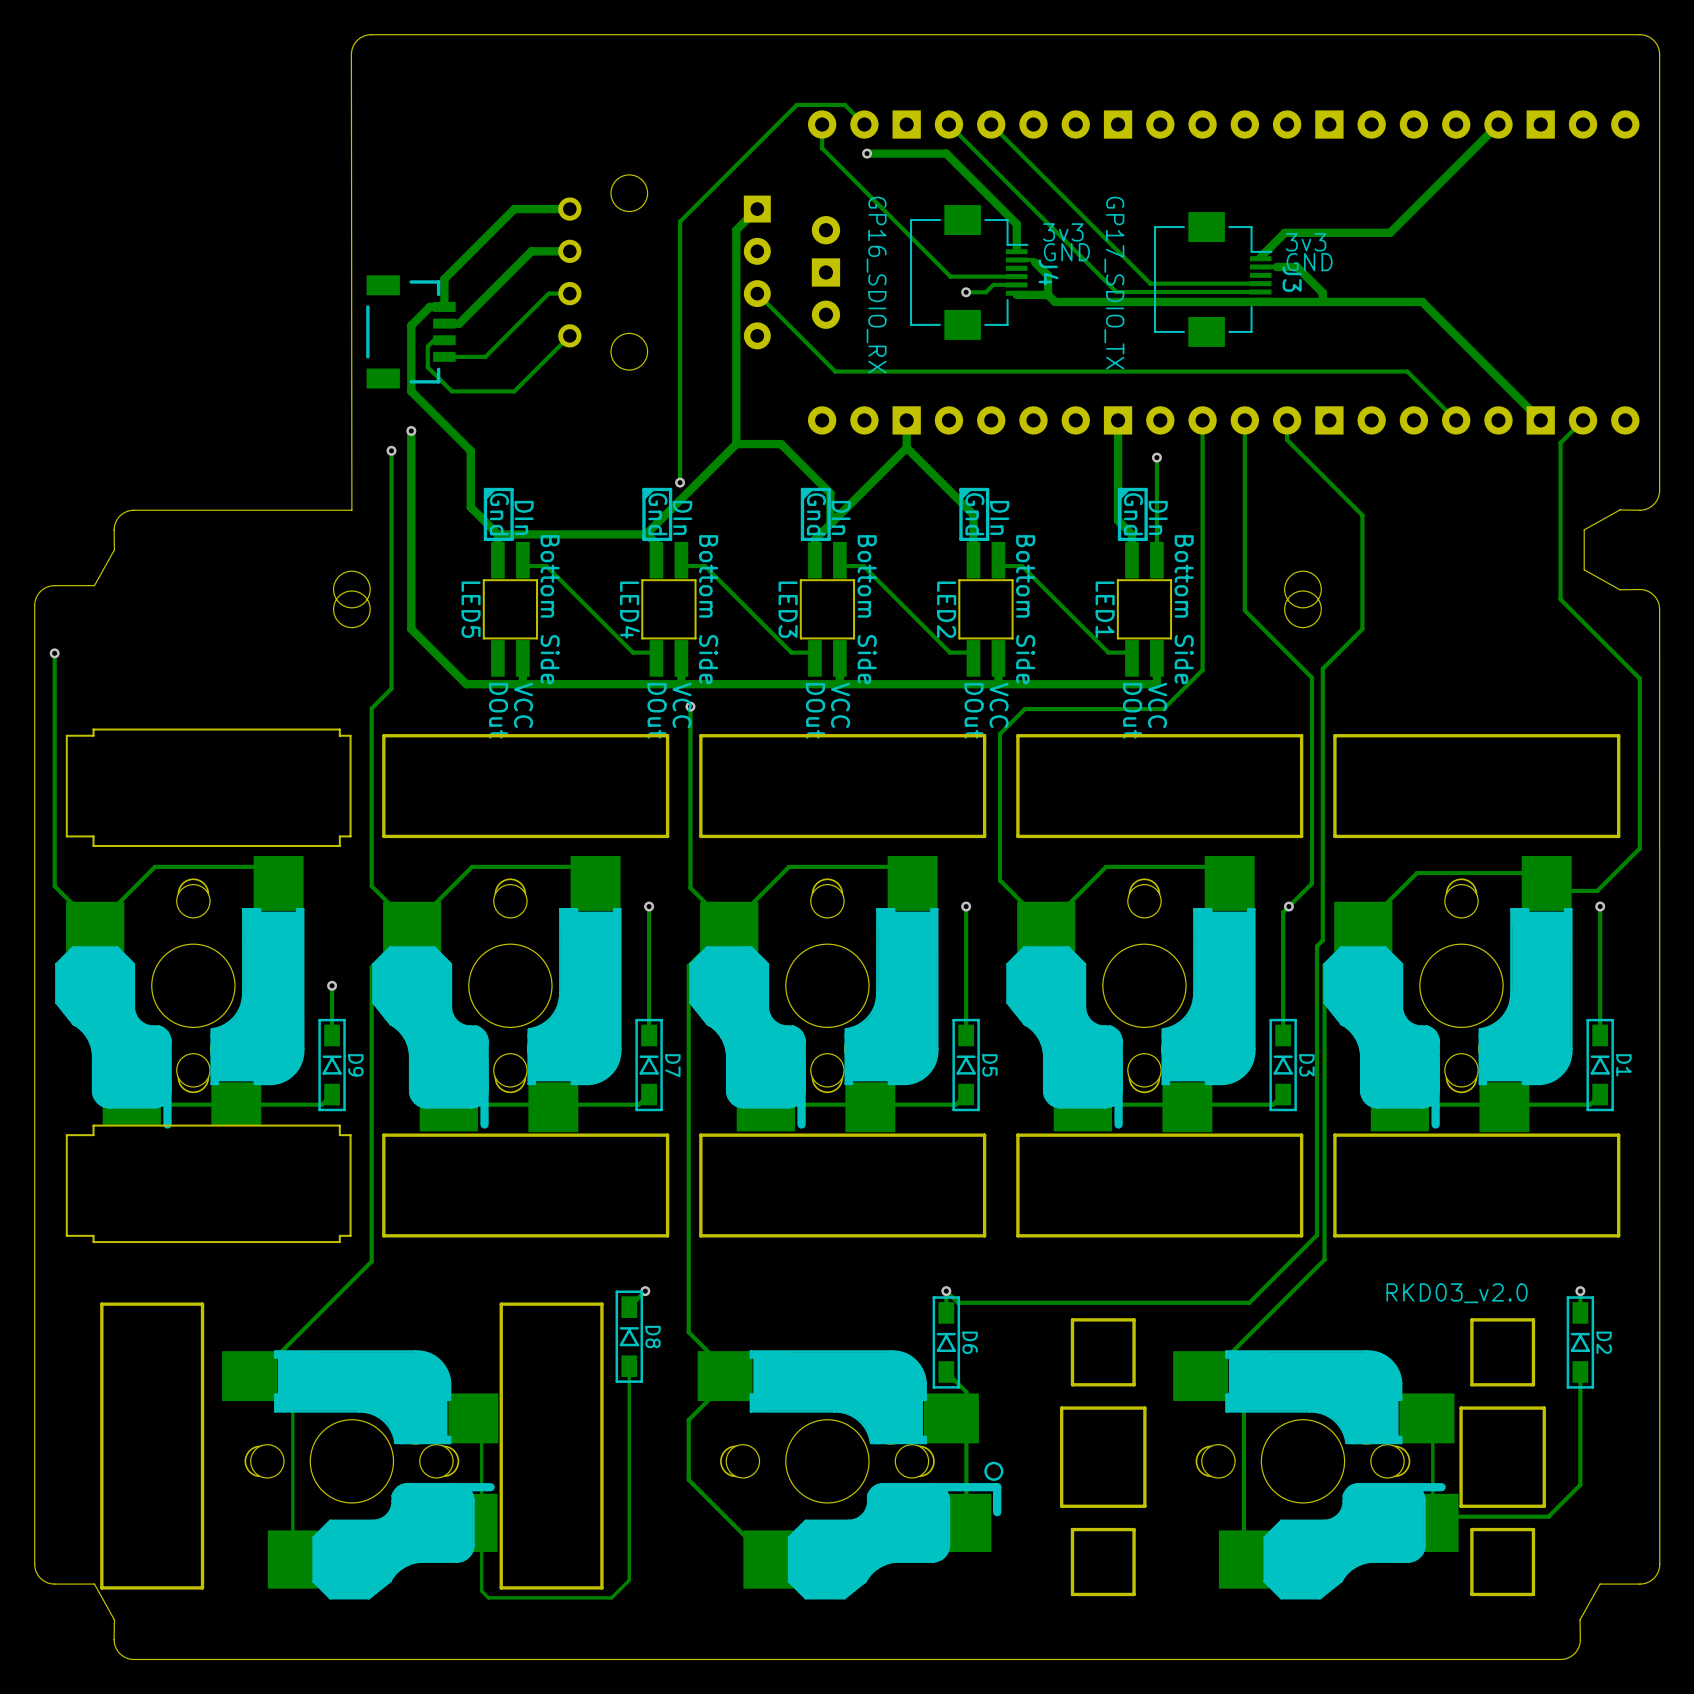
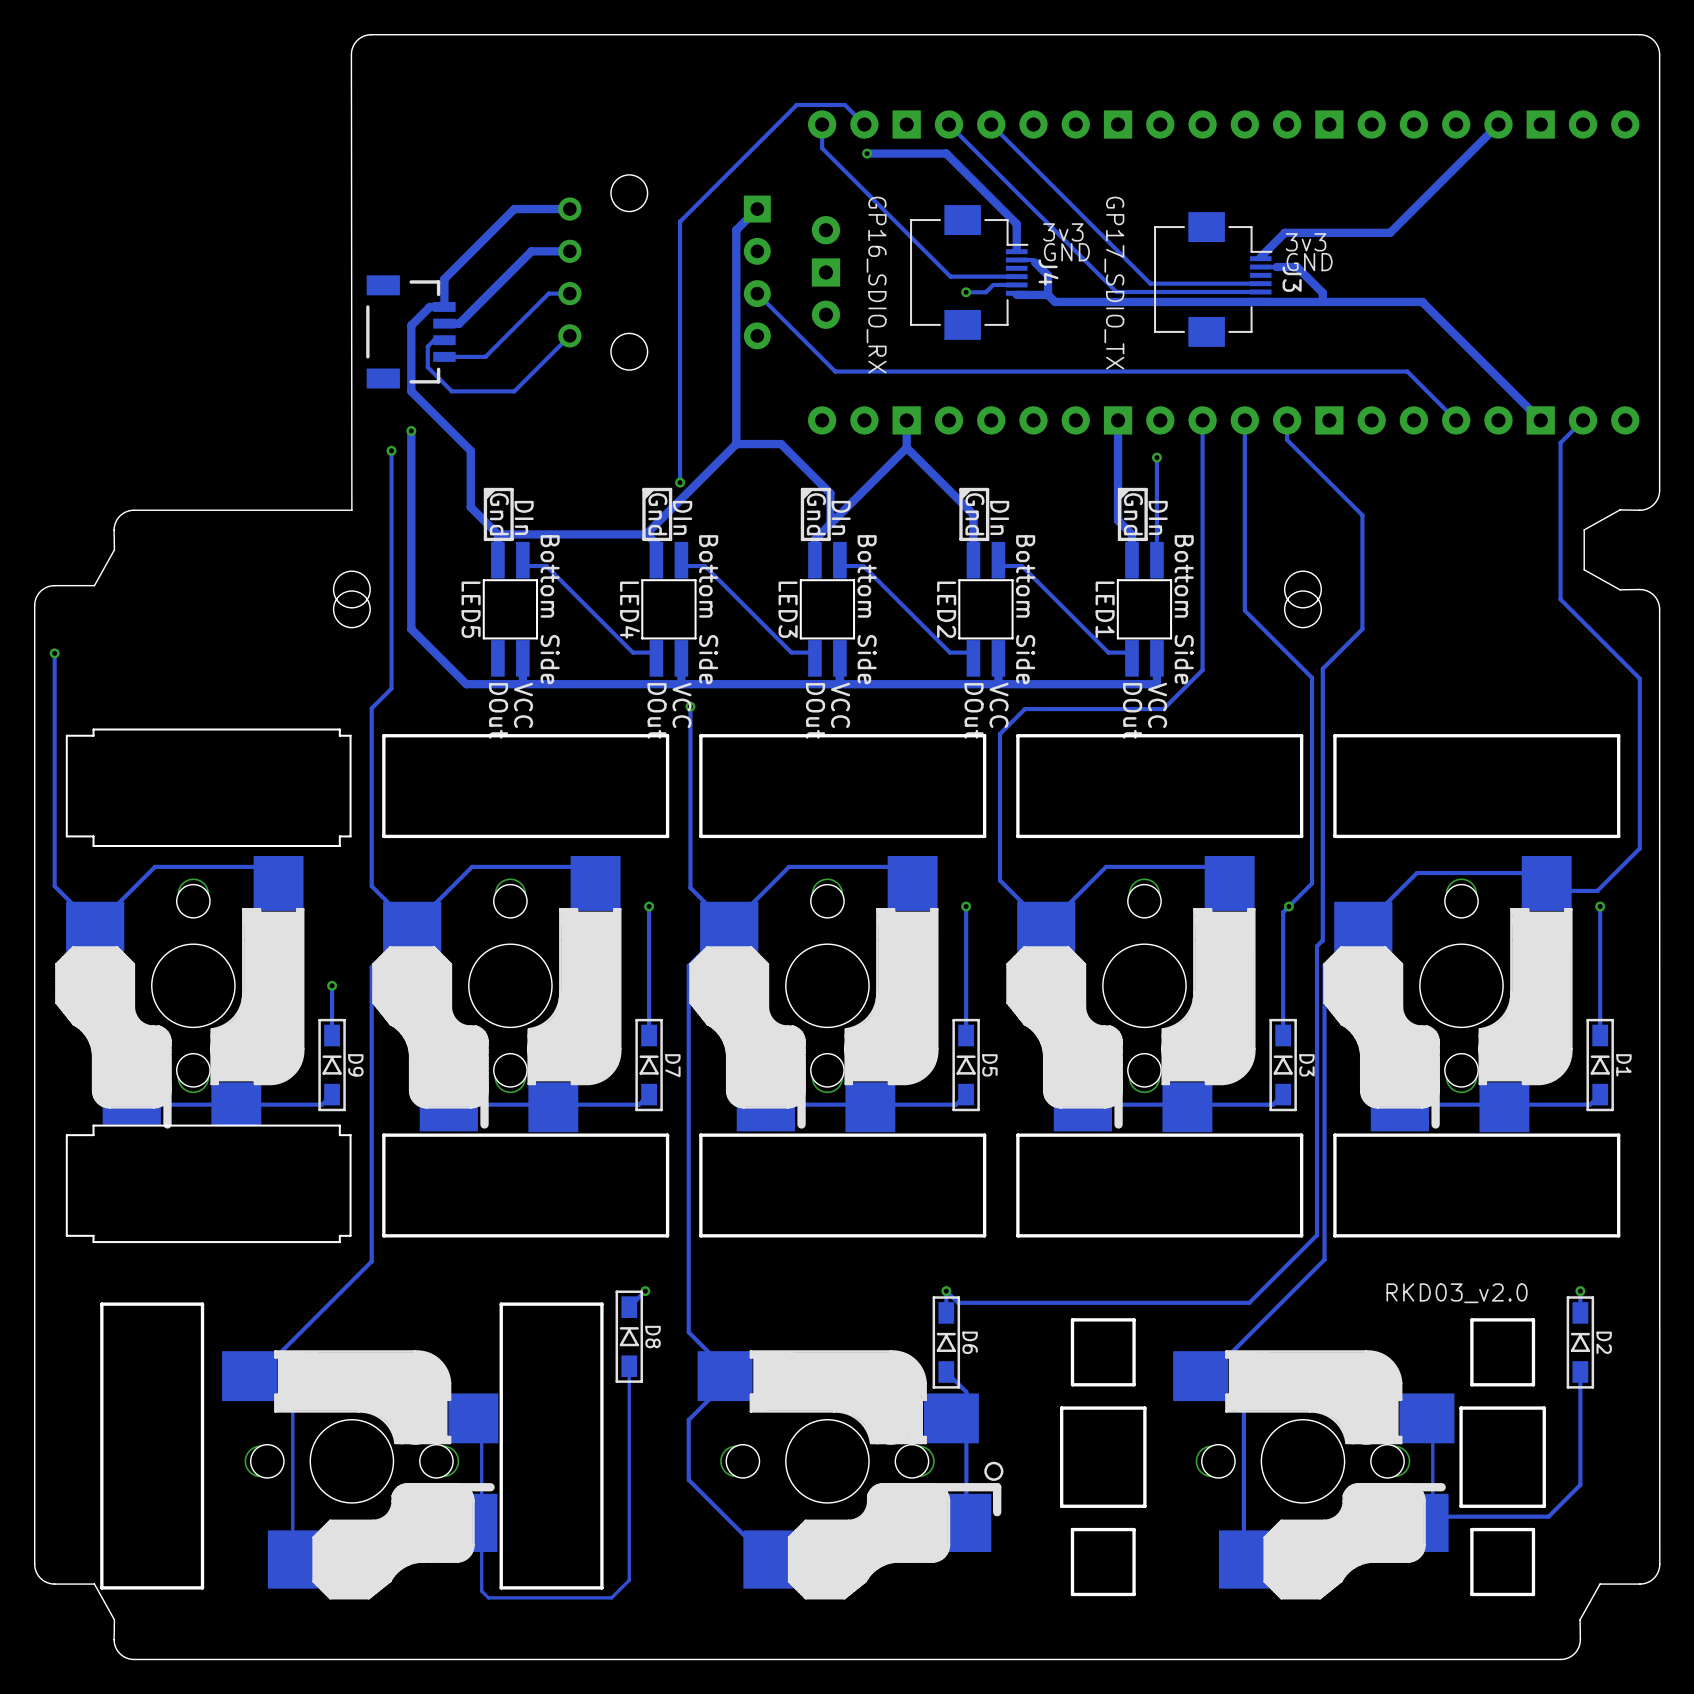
part footprint: [1060, 1318, 1546, 1600] -> [1060, 1318, 1546, 1600]

